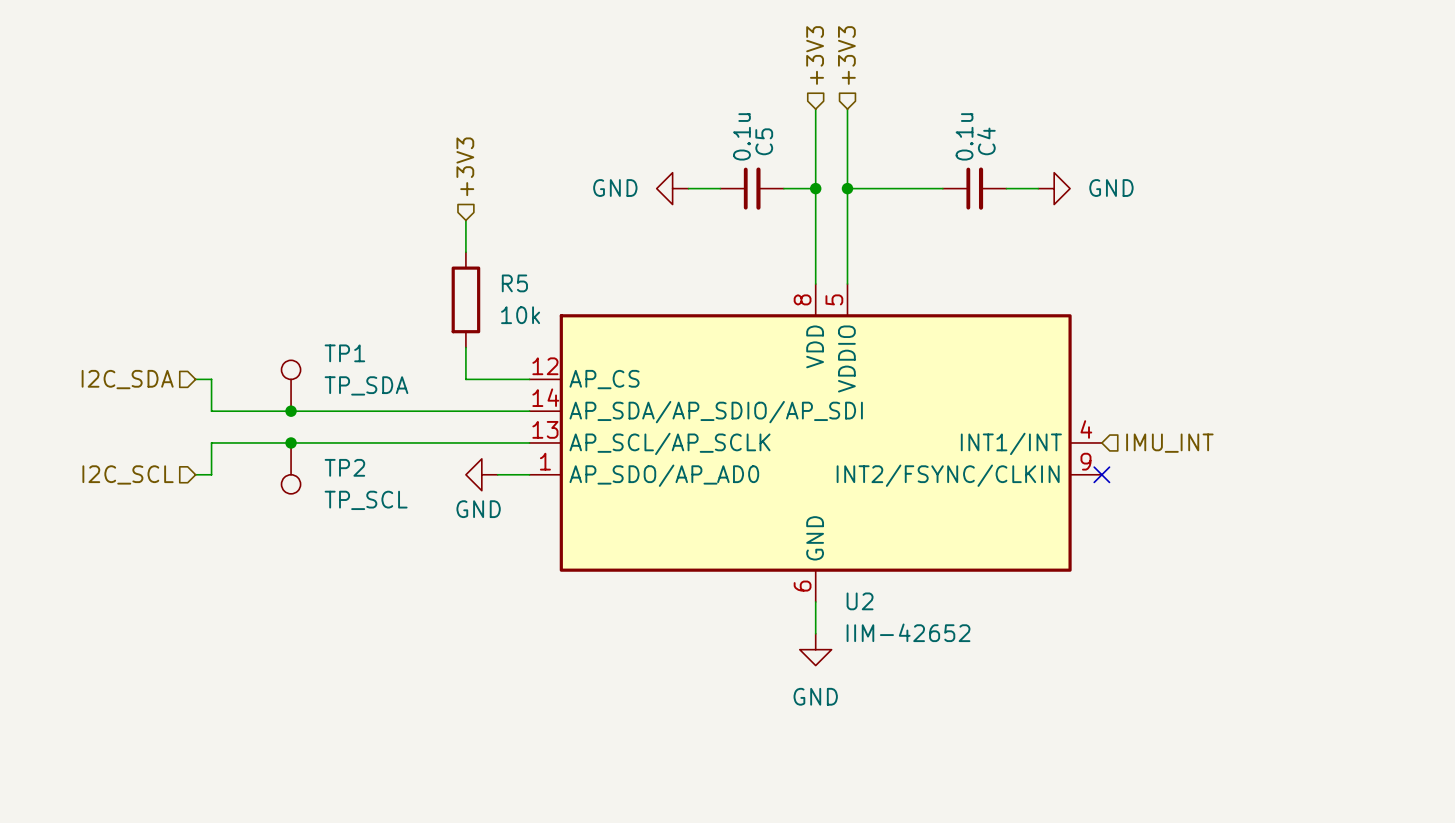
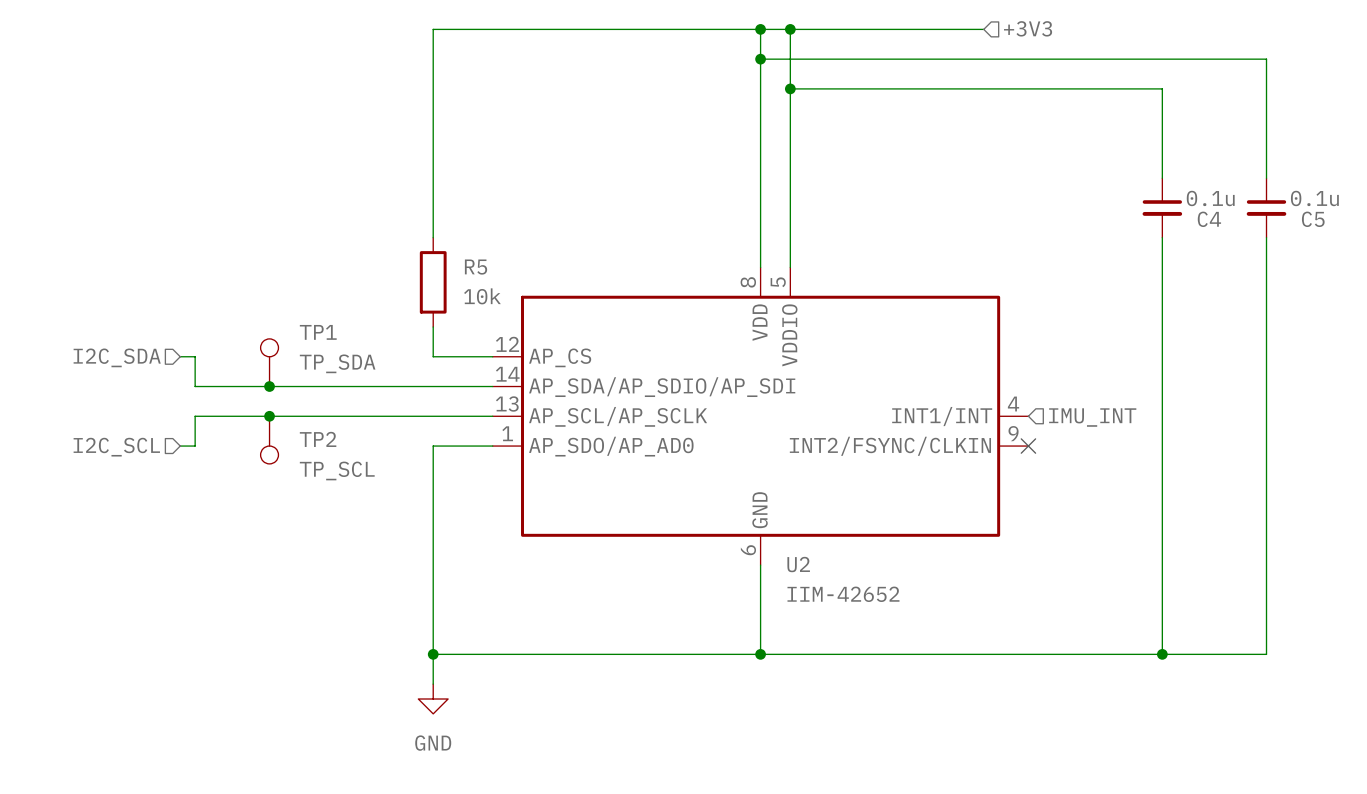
wire: none -> (760, 29) (760, 103)
junction: none -> (760, 29)
wire: none -> (790, 29) (790, 103)
junction: none -> (790, 29)
wire: none -> (983, 29) (433, 29) (433, 207)
hierarchical label: none -> +3V3 (1028, 28)
hierarchical label: +3V3 (815, 55) -> none
hierarchical label: +3V3 (846, 55) -> none
wire: none -> (760, 59) (1266, 59) (1266, 178)
junction: none -> (760, 59)
wire: none -> (790, 88) (1162, 88) (1162, 178)
junction: none -> (790, 88)
hierarchical label: +3V3 (465, 166) -> none
power symbol: GND (672, 188) -> none
wire: (688, 188) (720, 188) -> none
C5 rotation: 0° (752, 188) -> 90° clockwise (1266, 208)
C5 position: (752, 188) -> (1266, 207)
wire: (783, 188) (815, 188) -> none
junction: (815, 188) -> none
wire: (847, 188) (942, 188) -> none
junction: (847, 188) -> none
C4 rotation: 0° (974, 188) -> 90° clockwise (1162, 208)
C4 position: (974, 188) -> (1162, 207)
wire: (1006, 188) (1038, 188) -> none
power symbol: GND (1054, 188) -> none
wire: none -> (1162, 237) (1162, 654)
wire: none -> (1266, 237) (1266, 654) (433, 654)
power symbol: GND (481, 474) -> none
wire: none -> (462, 446) (433, 446) (433, 684)
wire: none -> (760, 594) (760, 654)
power symbol: GND (815, 649) -> none
junction: none -> (433, 654)
junction: none -> (760, 654)
junction: none -> (1162, 654)
power symbol: none -> GND (433, 699)

